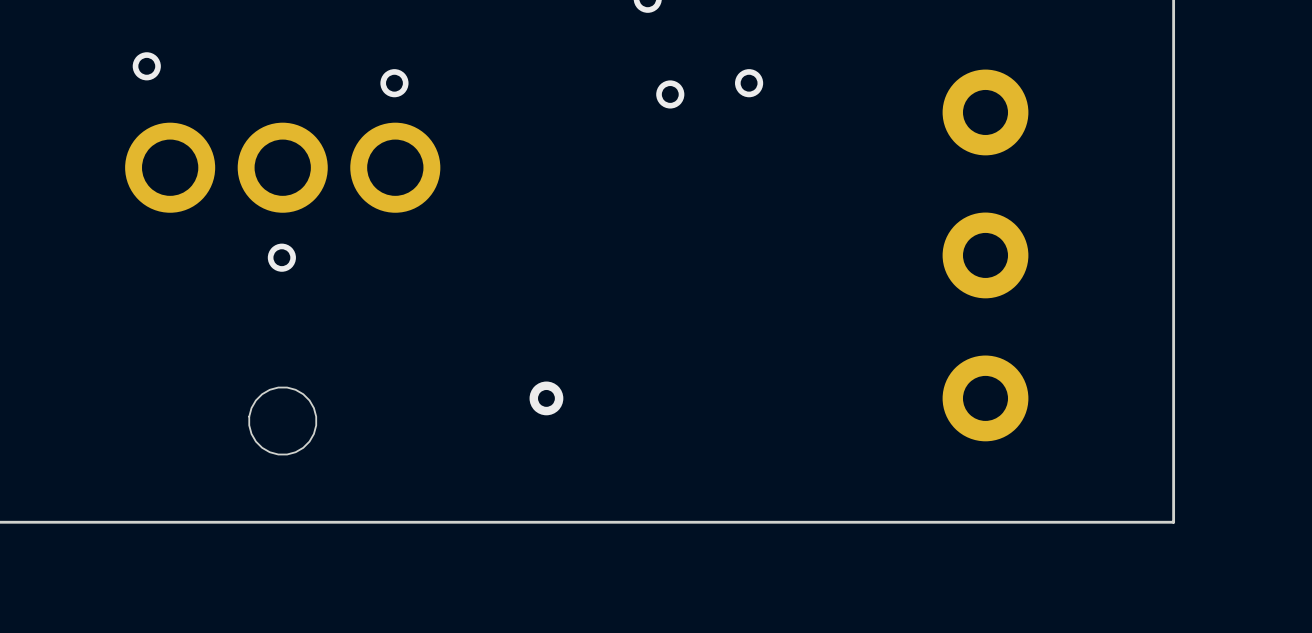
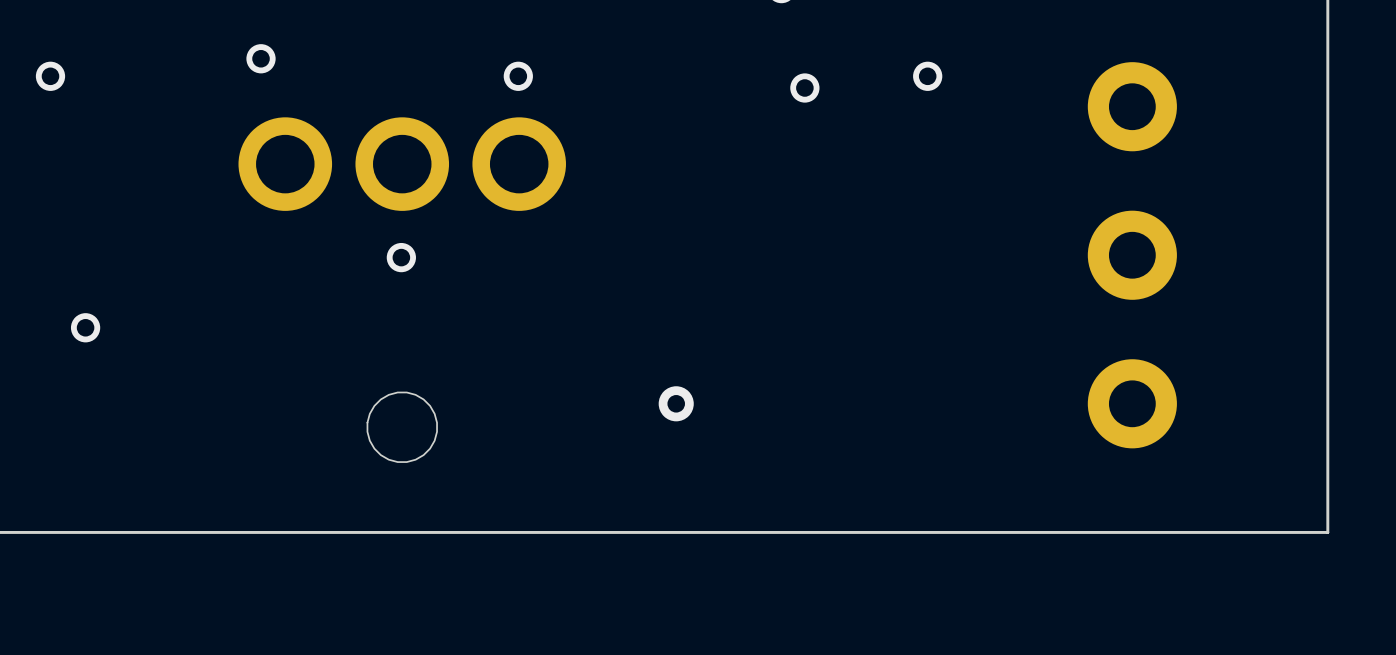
via position: (749, 83) -> (927, 76)

